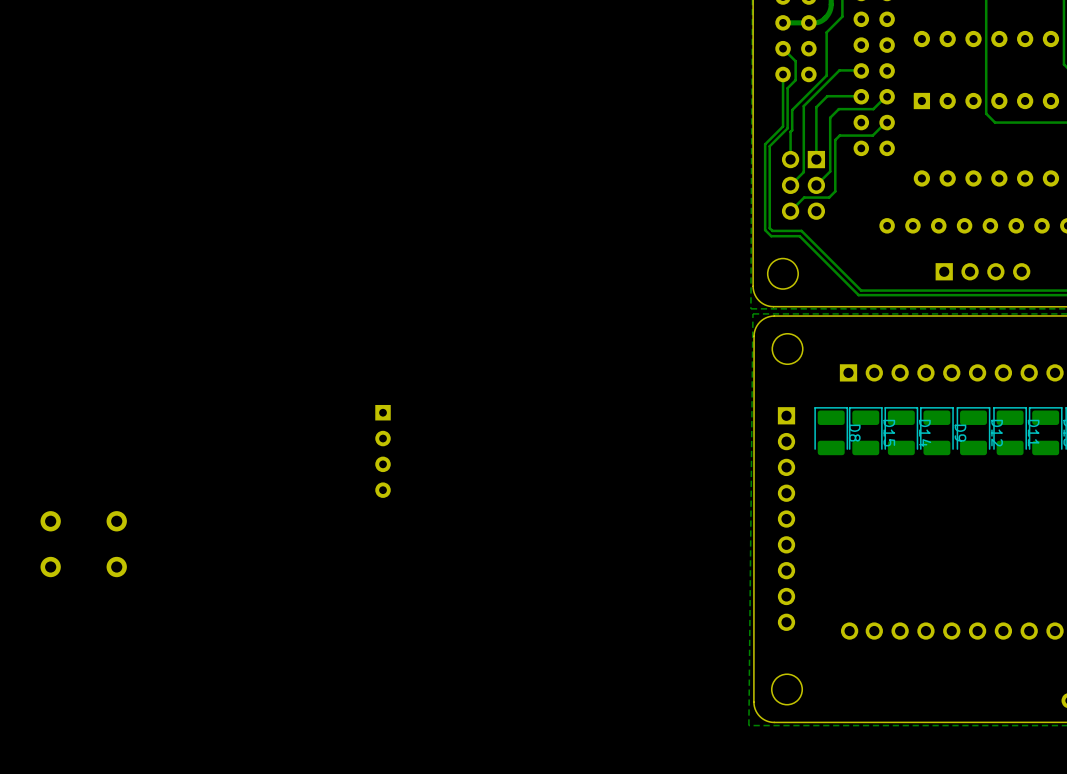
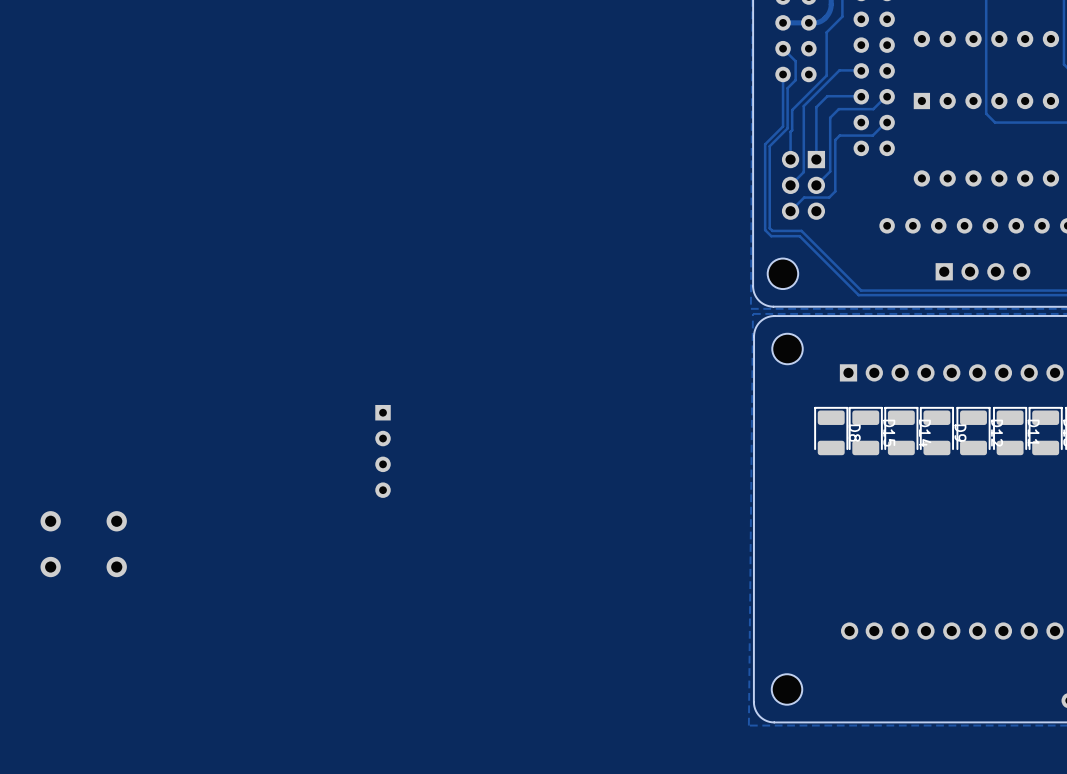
part: (786, 519) -> none

